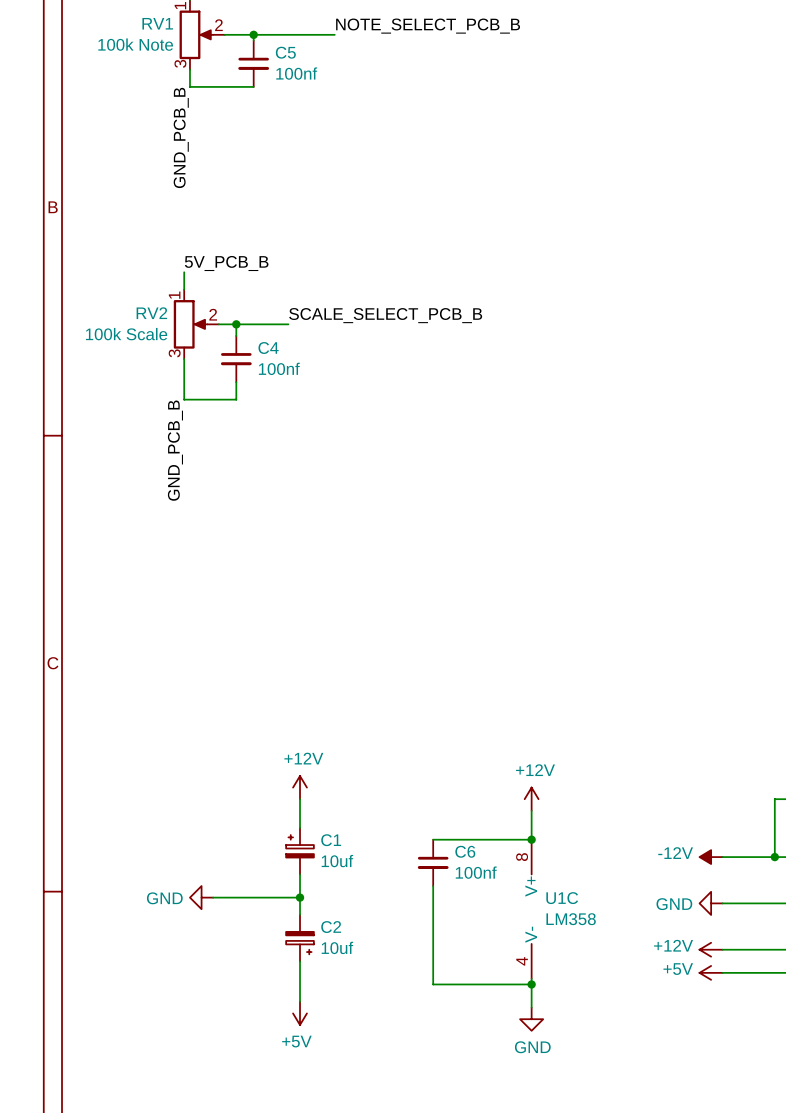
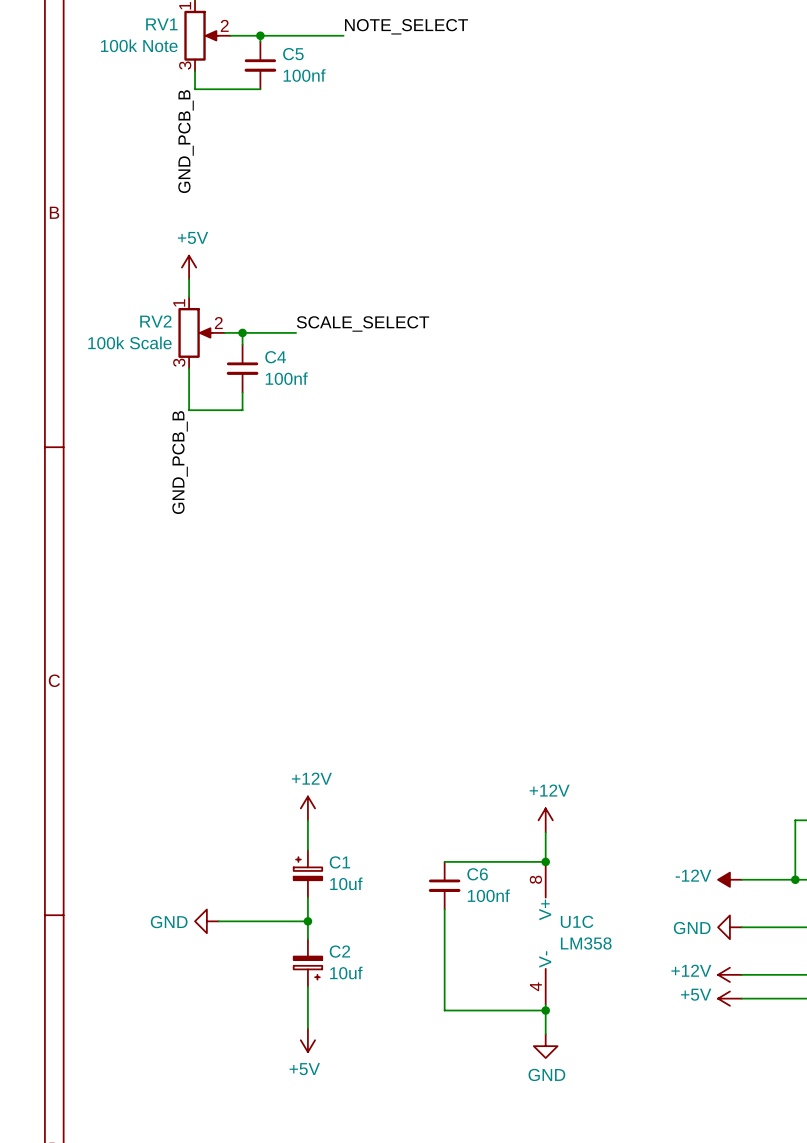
label: NOTE_SELECT_PCB_B (428, 26) -> NOTE_SELECT (406, 26)
power symbol: none -> +5V (189, 267)
label: 5V_PCB_B (226, 263) -> none
label: SCALE_SELECT_PCB_B (385, 315) -> SCALE_SELECT (362, 323)

